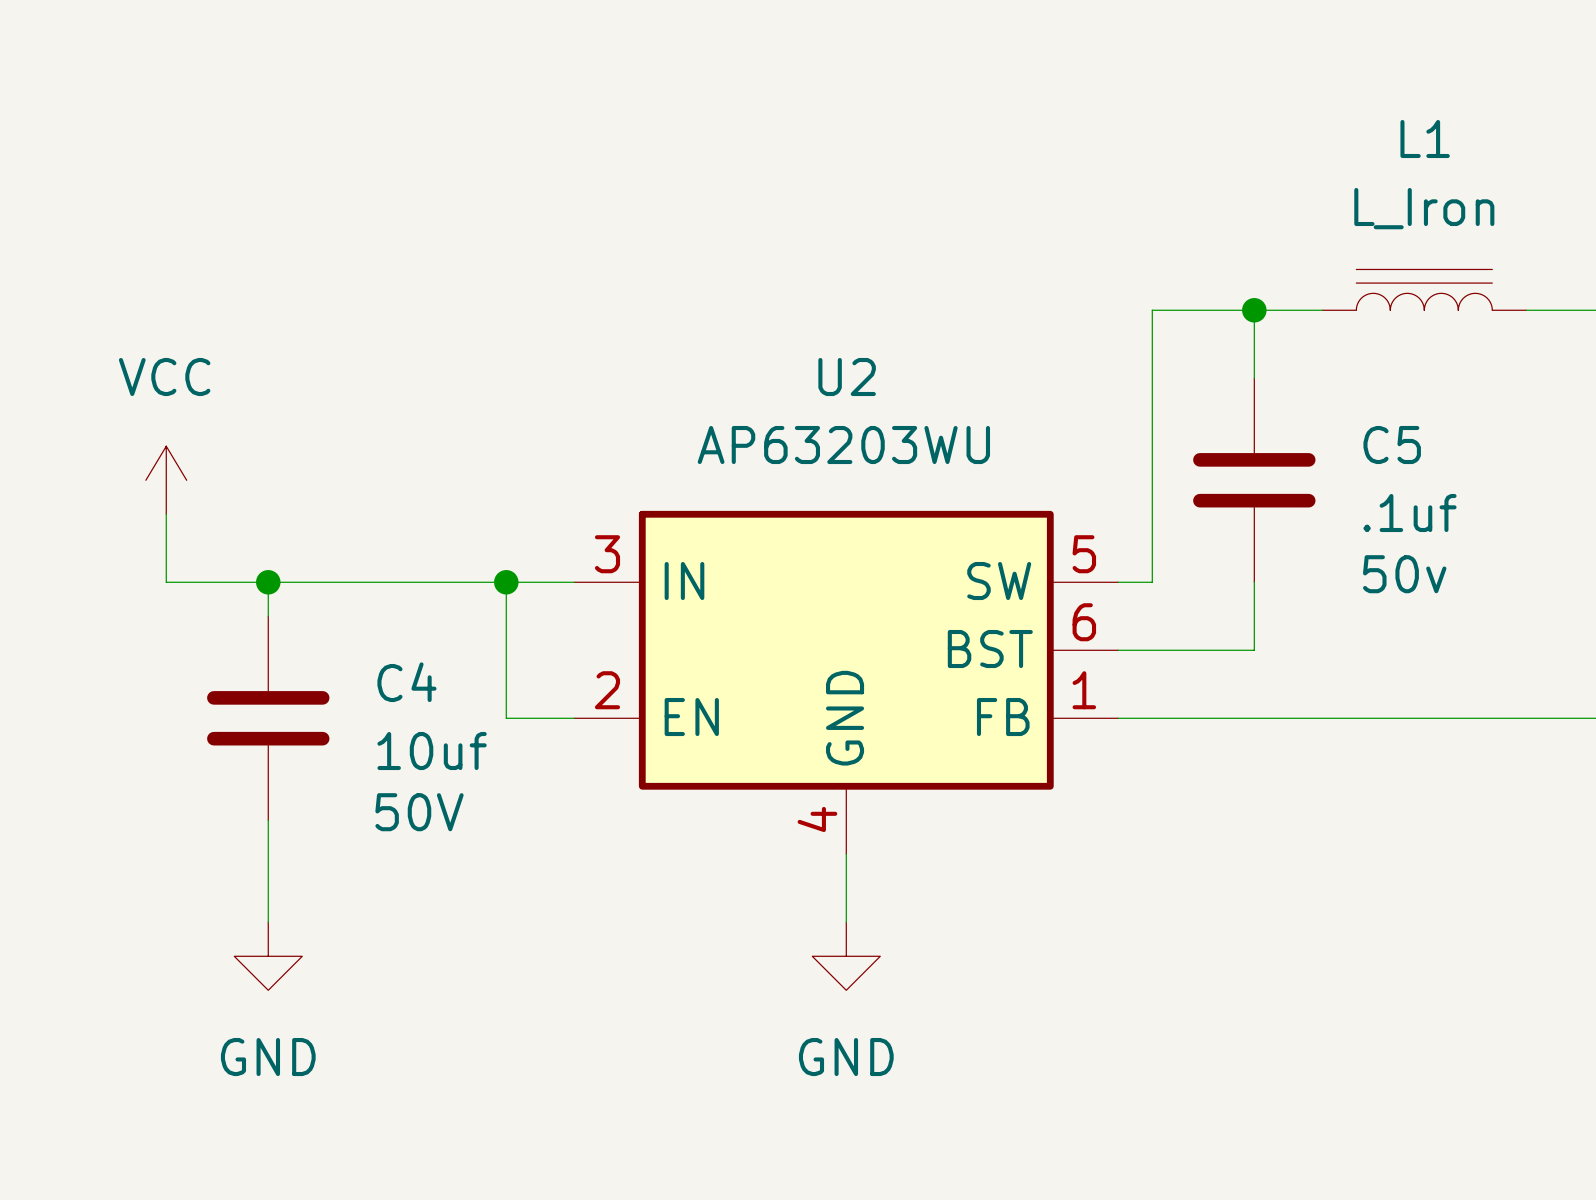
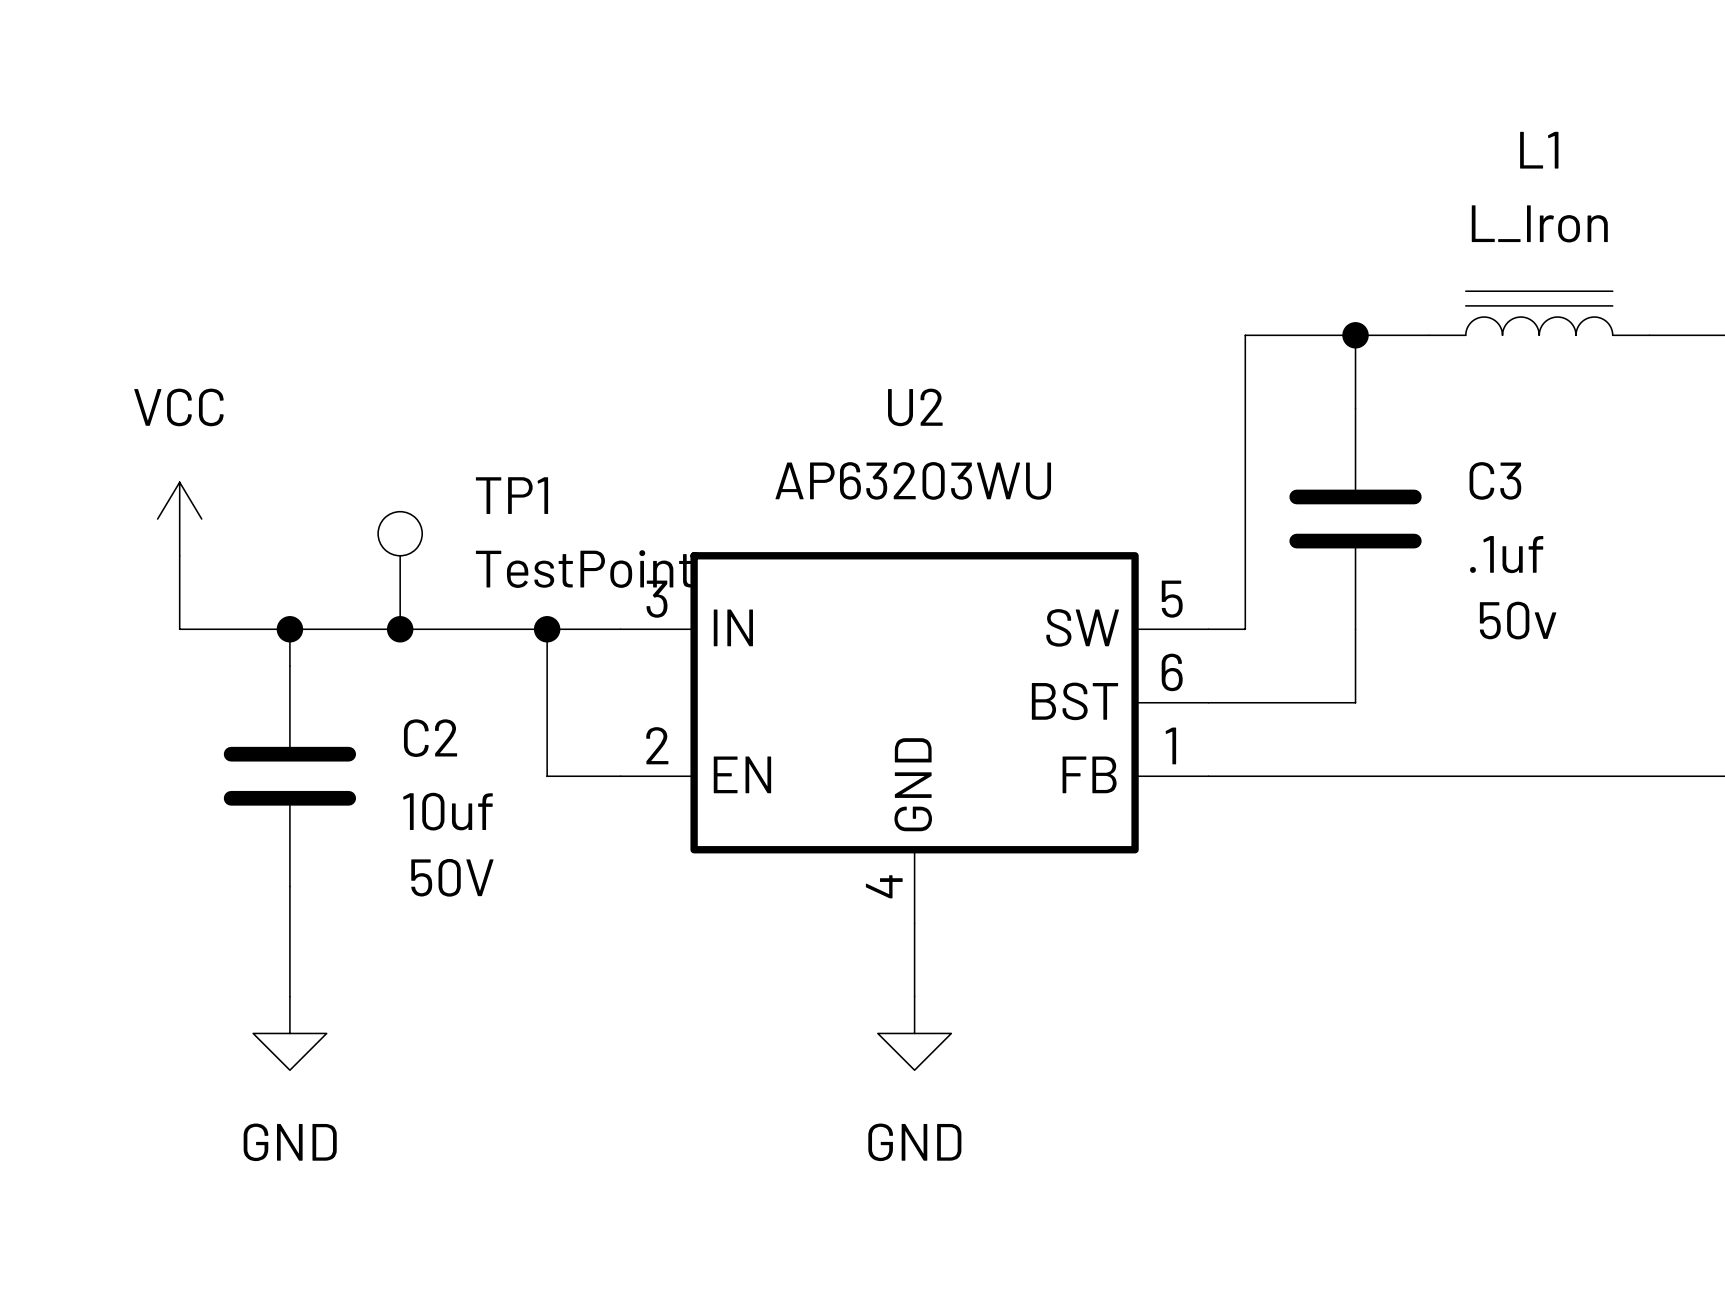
C5 name: C5 (1392, 445) -> C3 (1495, 480)
TP1: none -> TestPoint (400, 570)
junction: none -> (400, 629)
C4 name: C4 (406, 682) -> C2 (430, 738)

